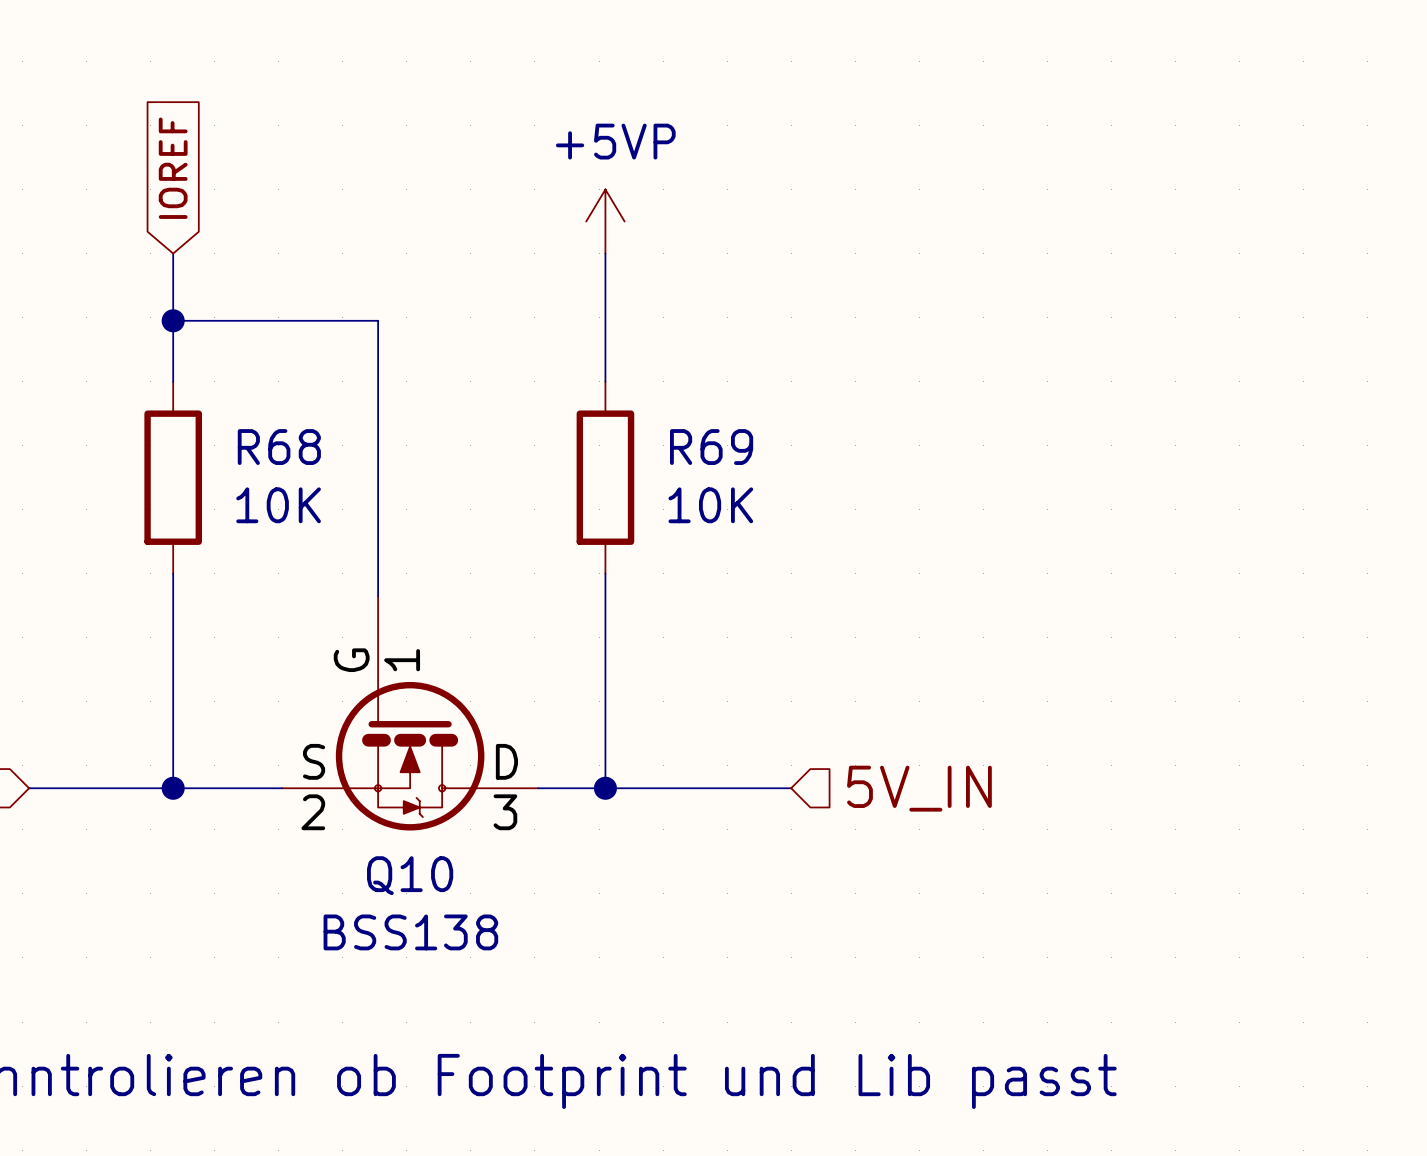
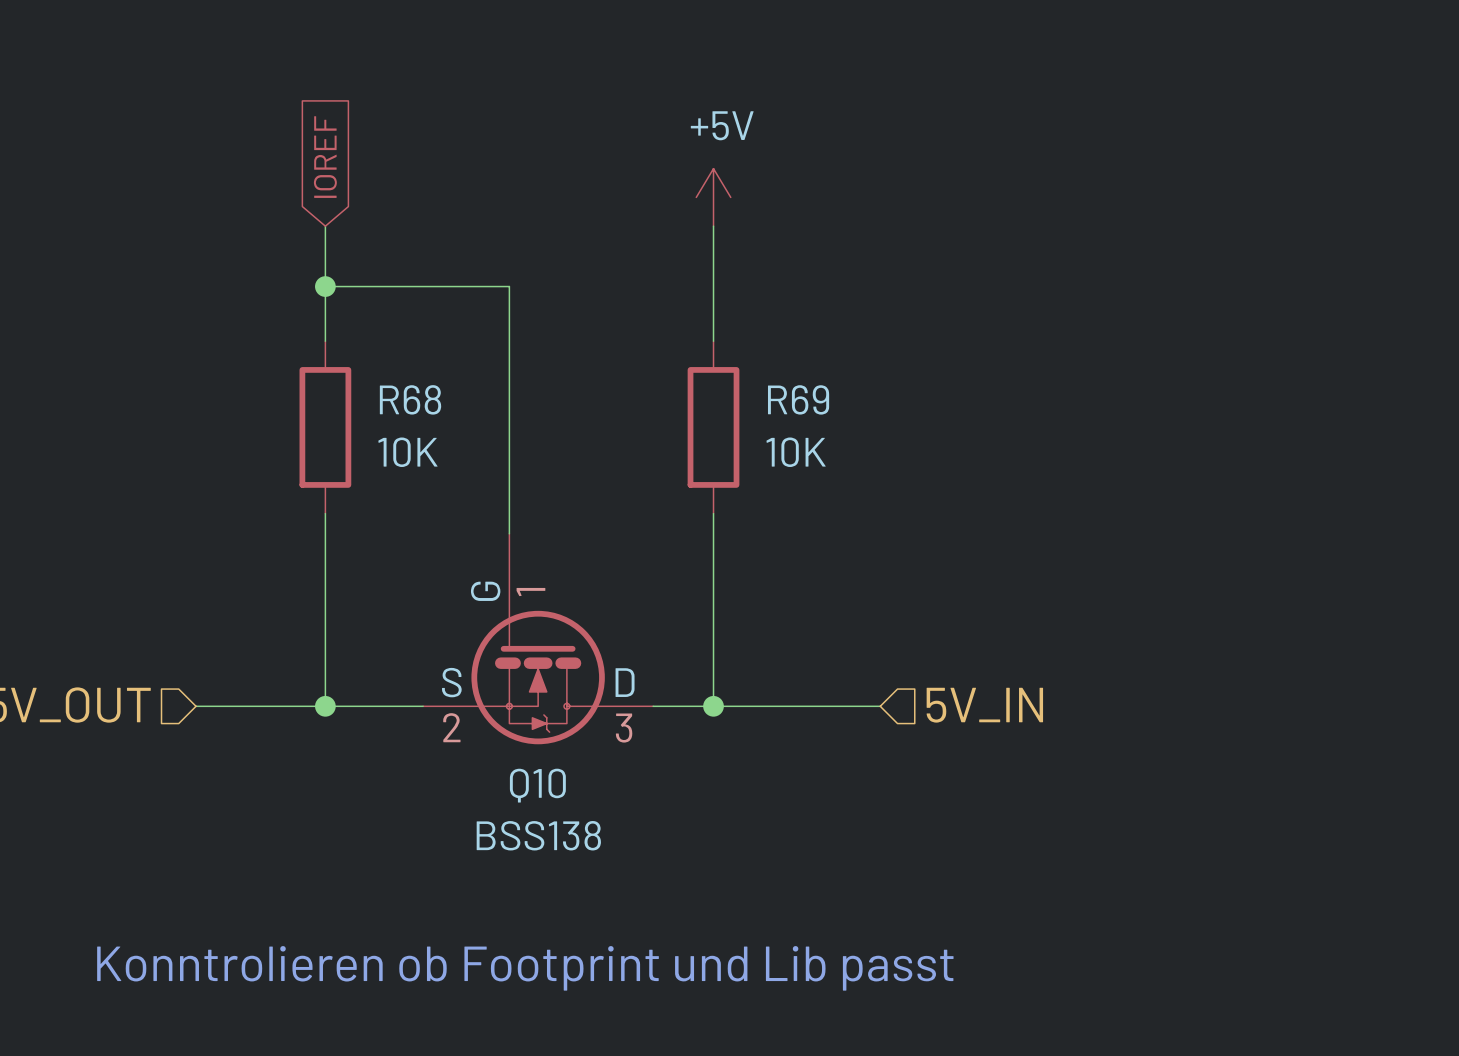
power symbol: +5VP (605, 221) -> +5V (713, 197)

